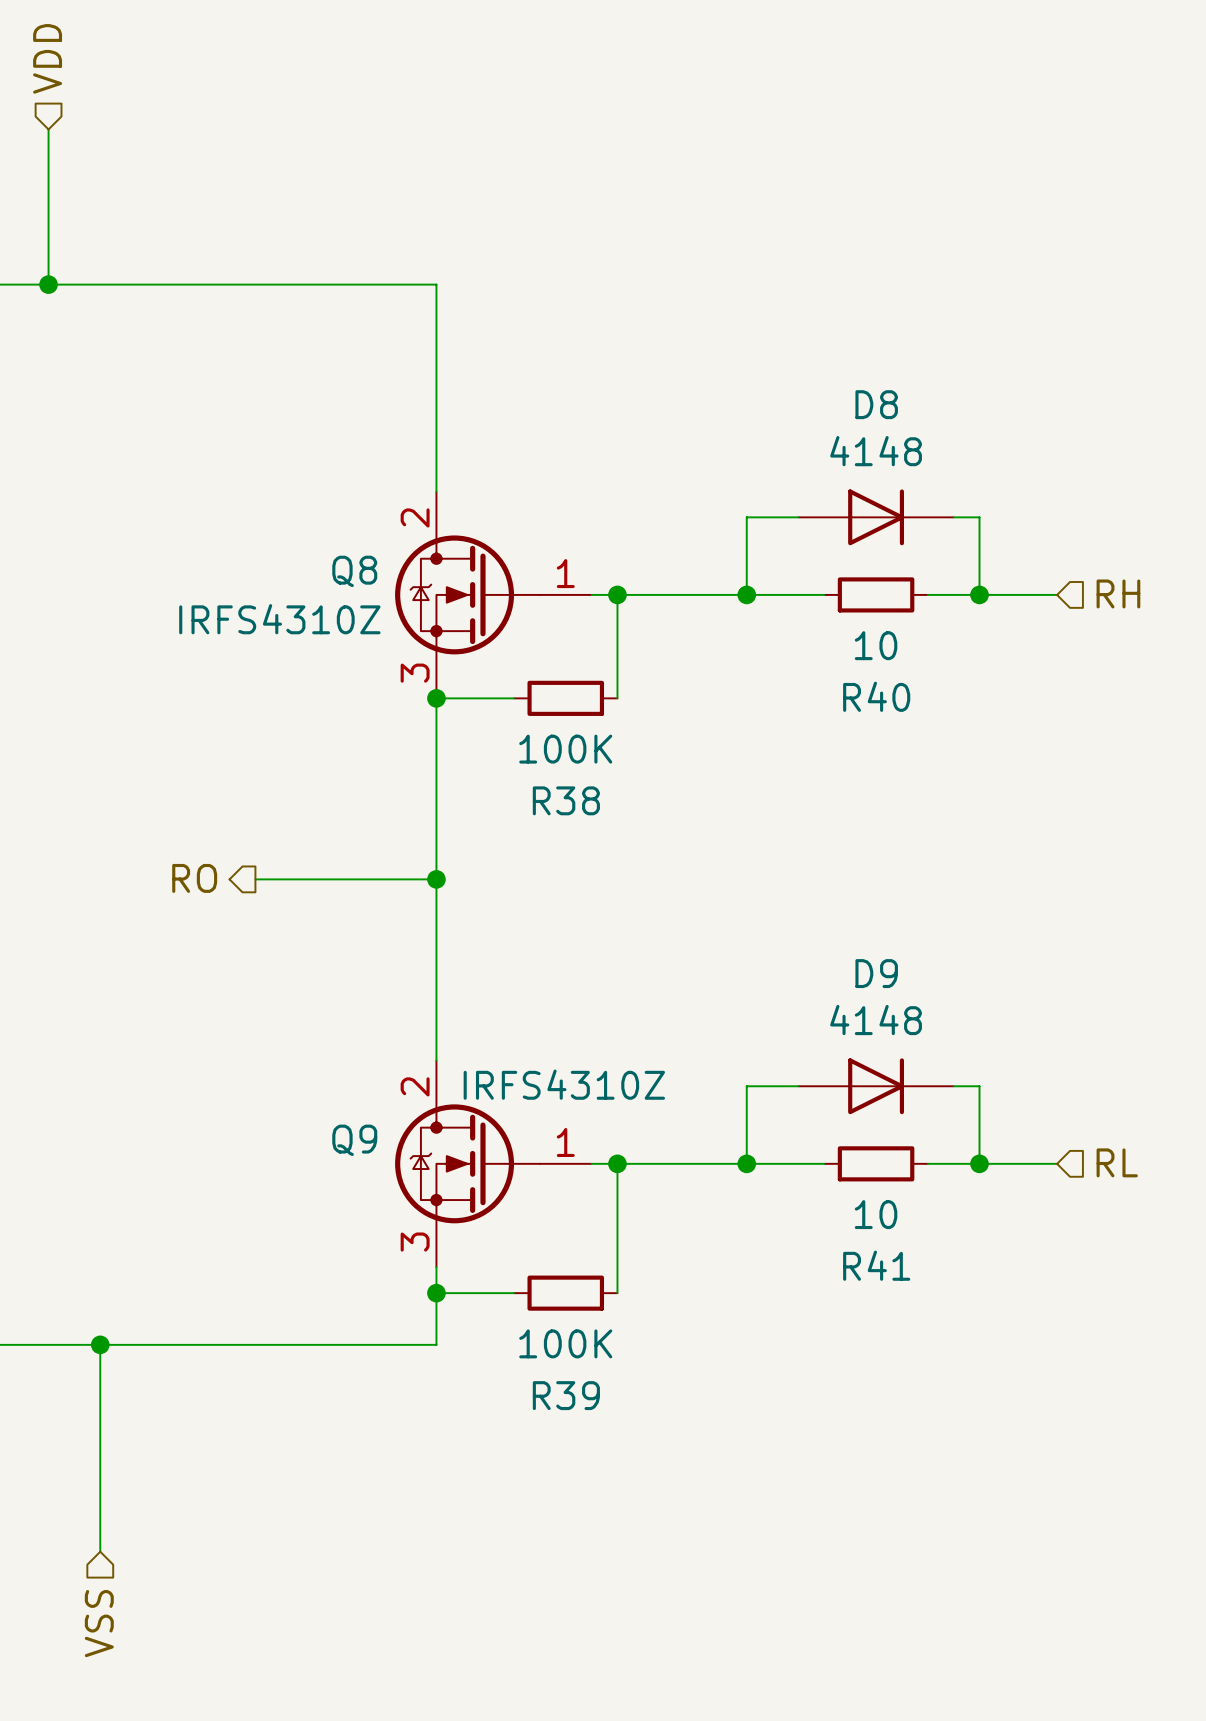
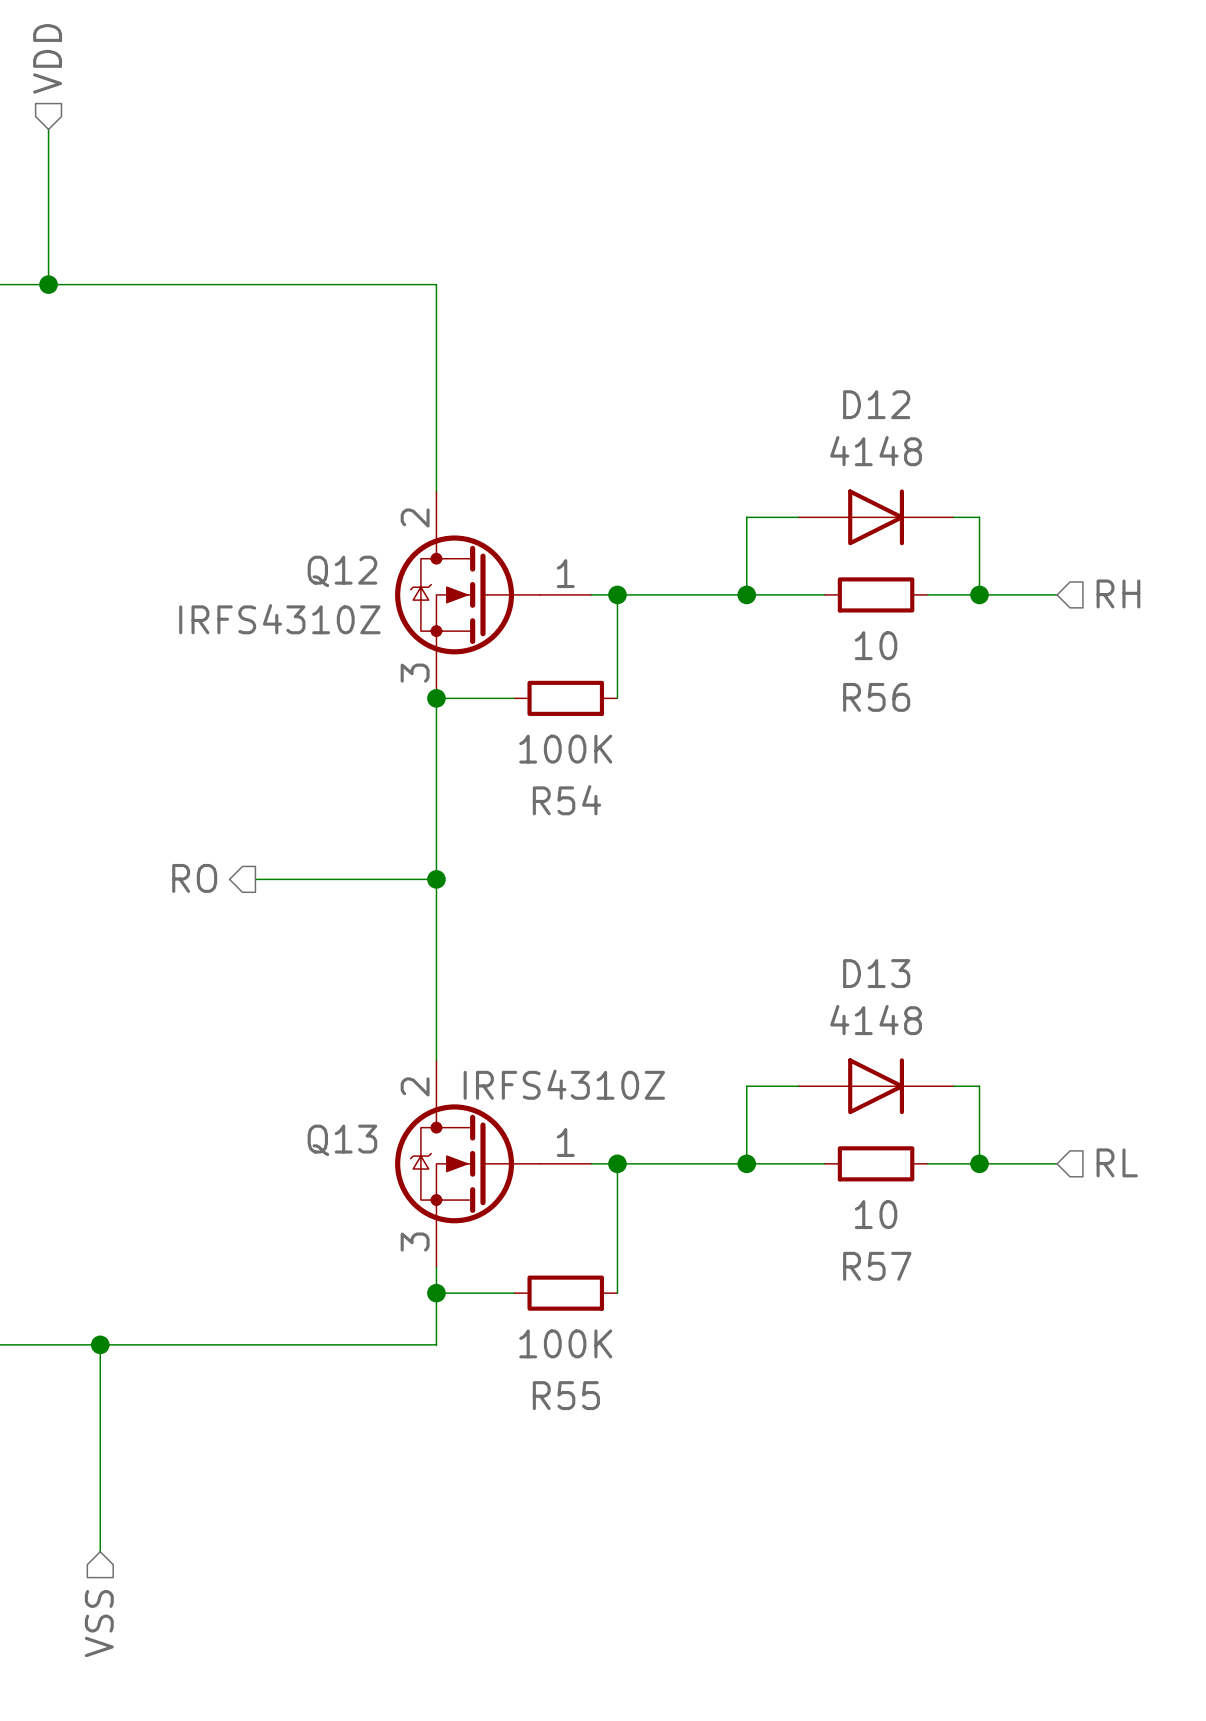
D8 name: D8 (876, 404) -> D12 (876, 404)
Q8 name: Q8 (354, 571) -> Q12 (342, 571)
R40 name: R40 (876, 696) -> R56 (876, 697)
R38 name: R38 (566, 800) -> R54 (566, 800)
D9 name: D9 (876, 973) -> D13 (876, 973)
Q9 name: Q9 (354, 1140) -> Q13 (342, 1140)
R41 name: R41 (876, 1265) -> R57 (877, 1266)
R39 name: R39 (566, 1395) -> R55 (566, 1395)

